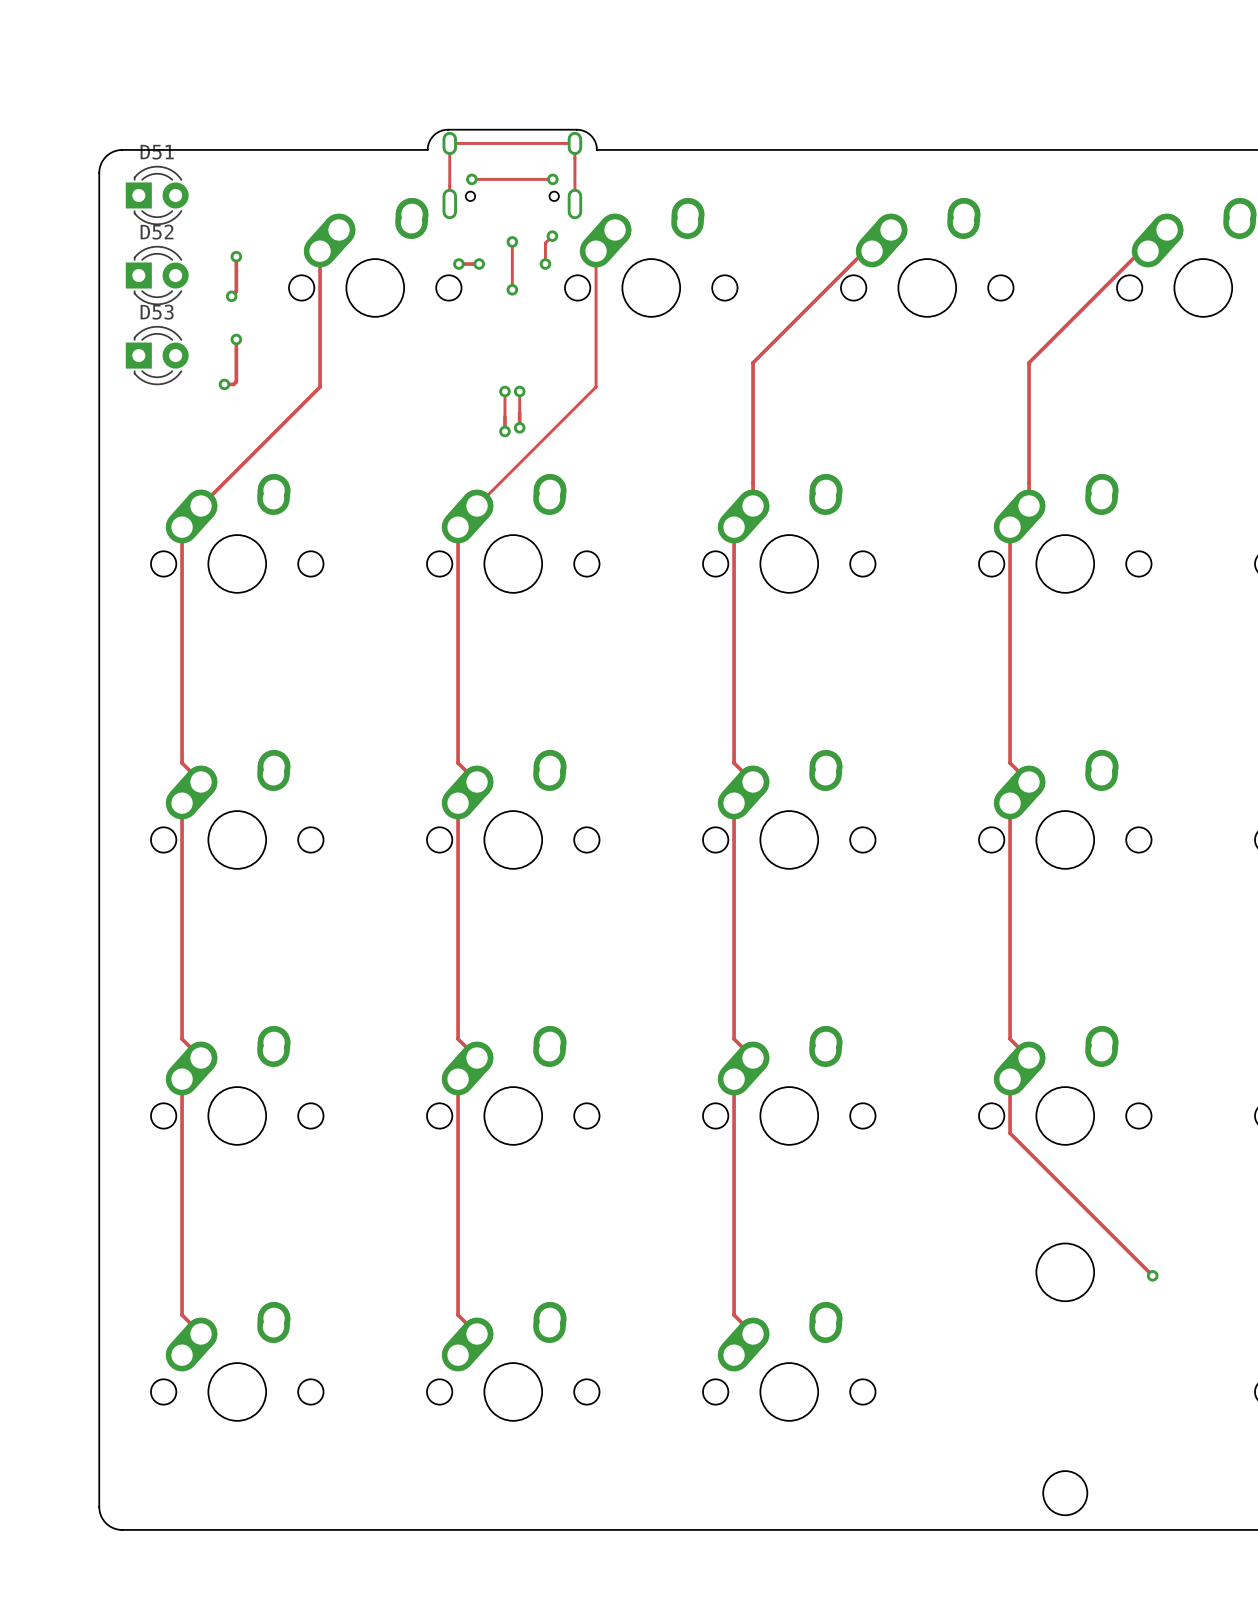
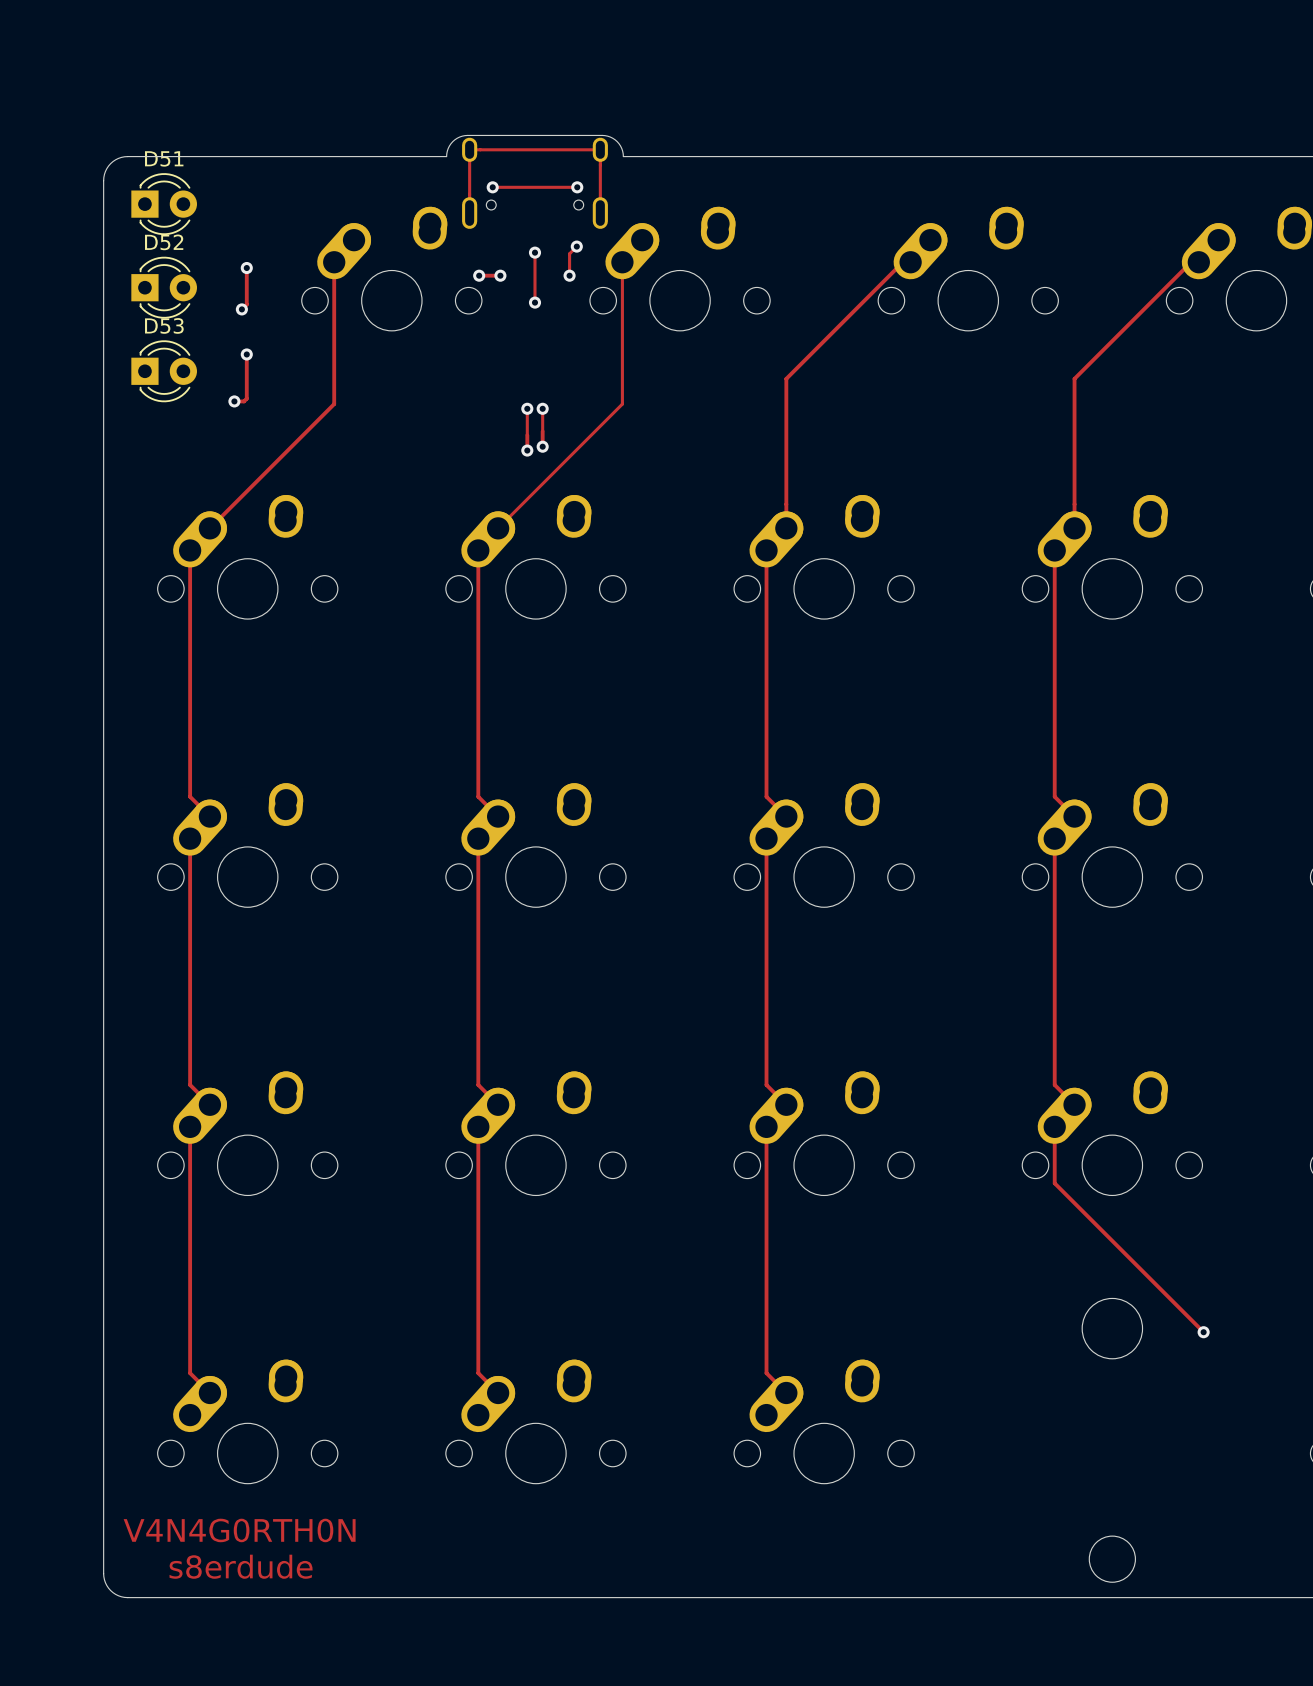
text: none -> V4N4G0RTH0N (239, 1530)
text: none -> s8erdude (241, 1566)

